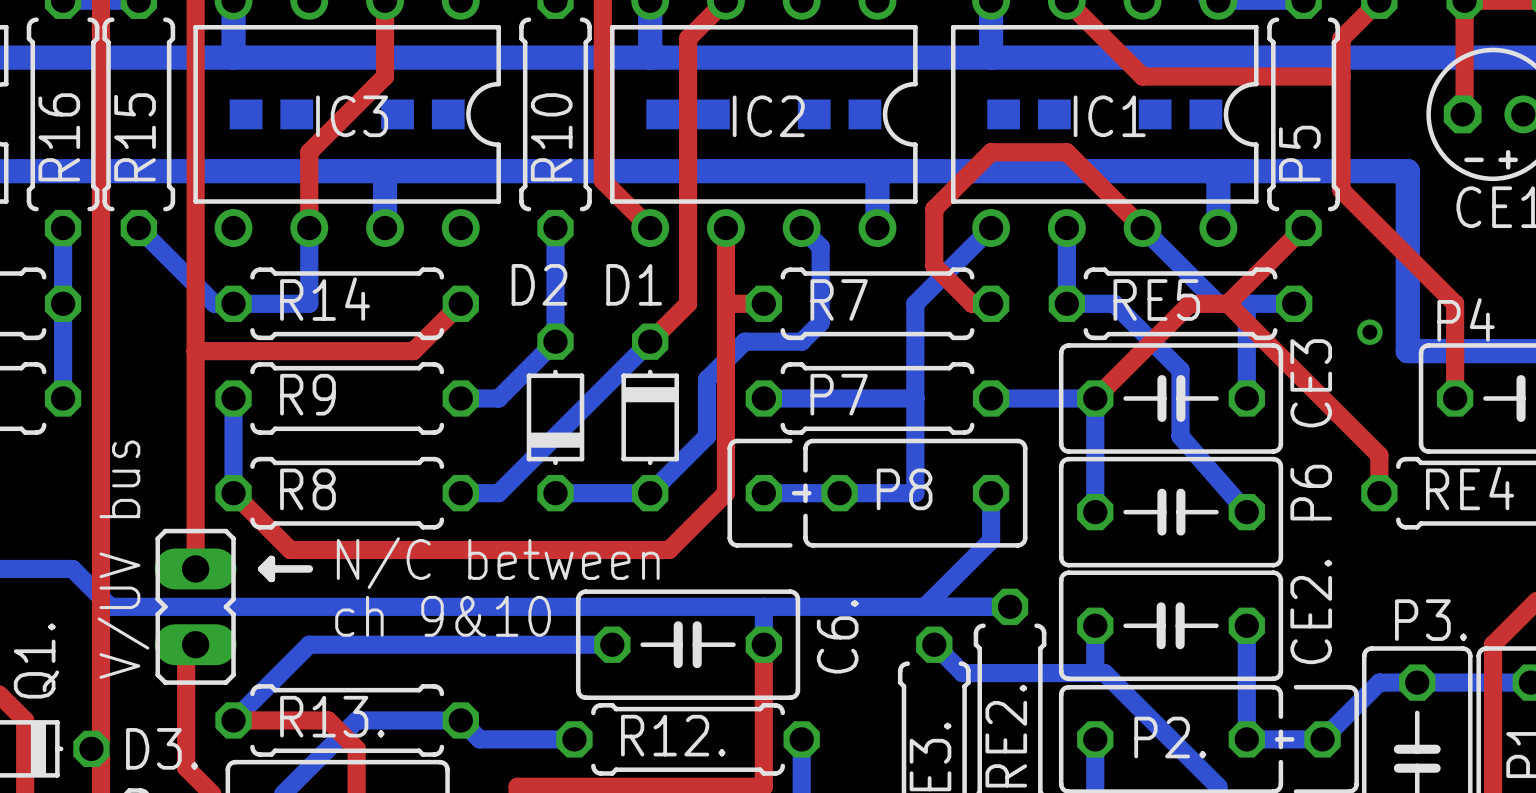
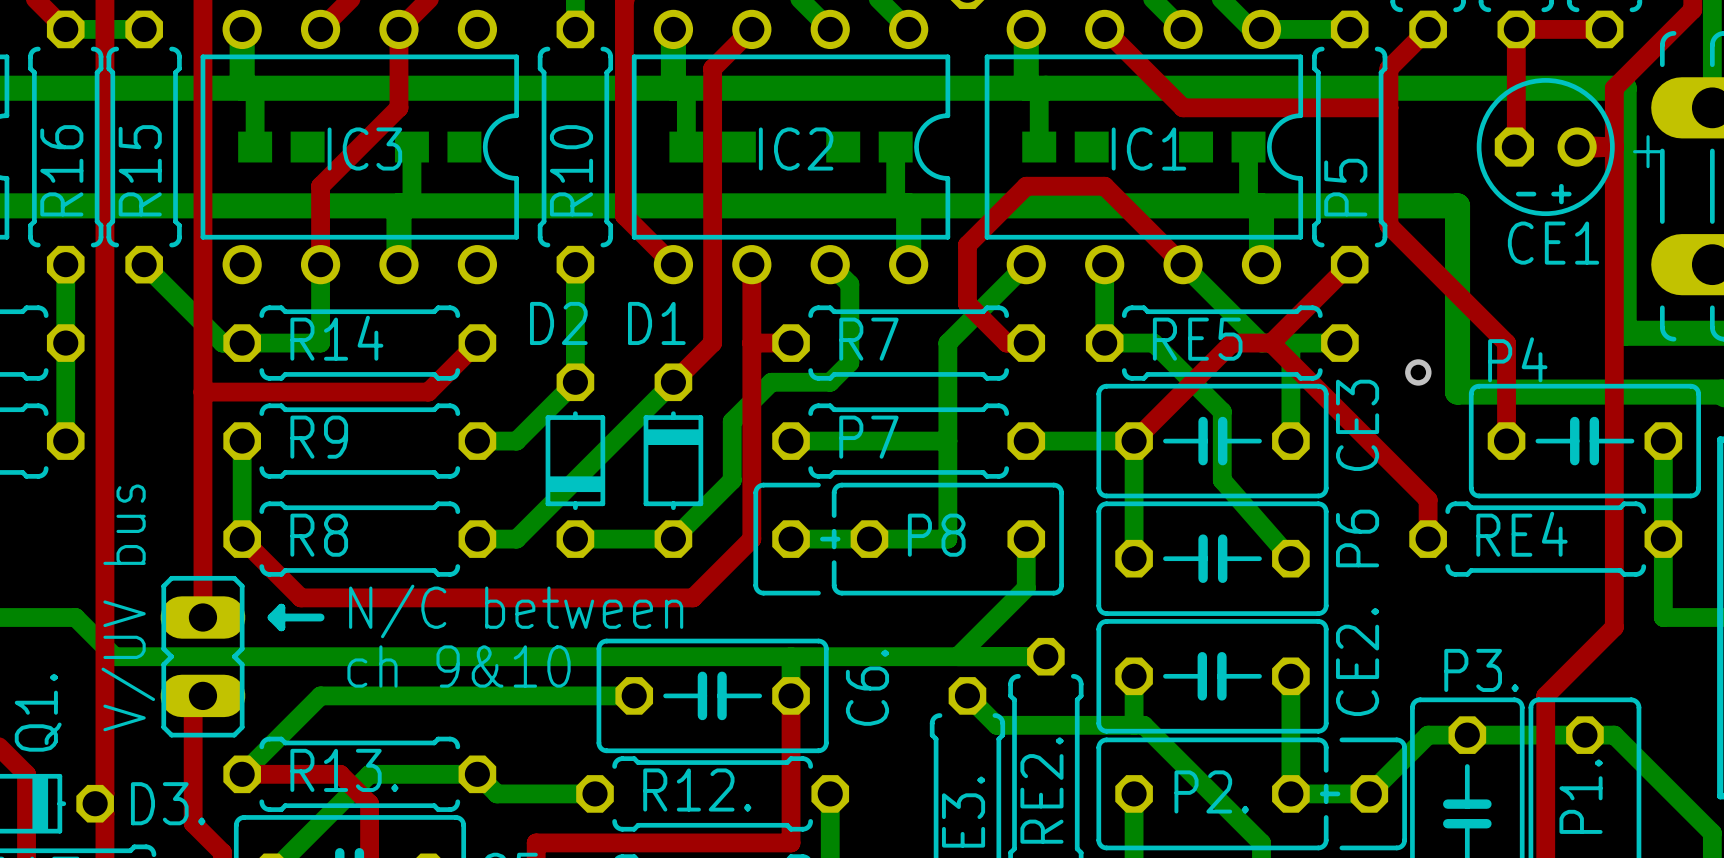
bottom track: none -> (251, 88) (255, 91) (255, 147)
bottom track: none -> (683, 88) (686, 91) (686, 147)
bottom track: none -> (1045, 88) (1039, 94) (1039, 147)
bottom track: none -> (411, 147) (411, 202) (408, 205)
bottom track: none -> (895, 147) (895, 202) (898, 205)
bottom track: none -> (1248, 147) (1248, 202) (1251, 205)

